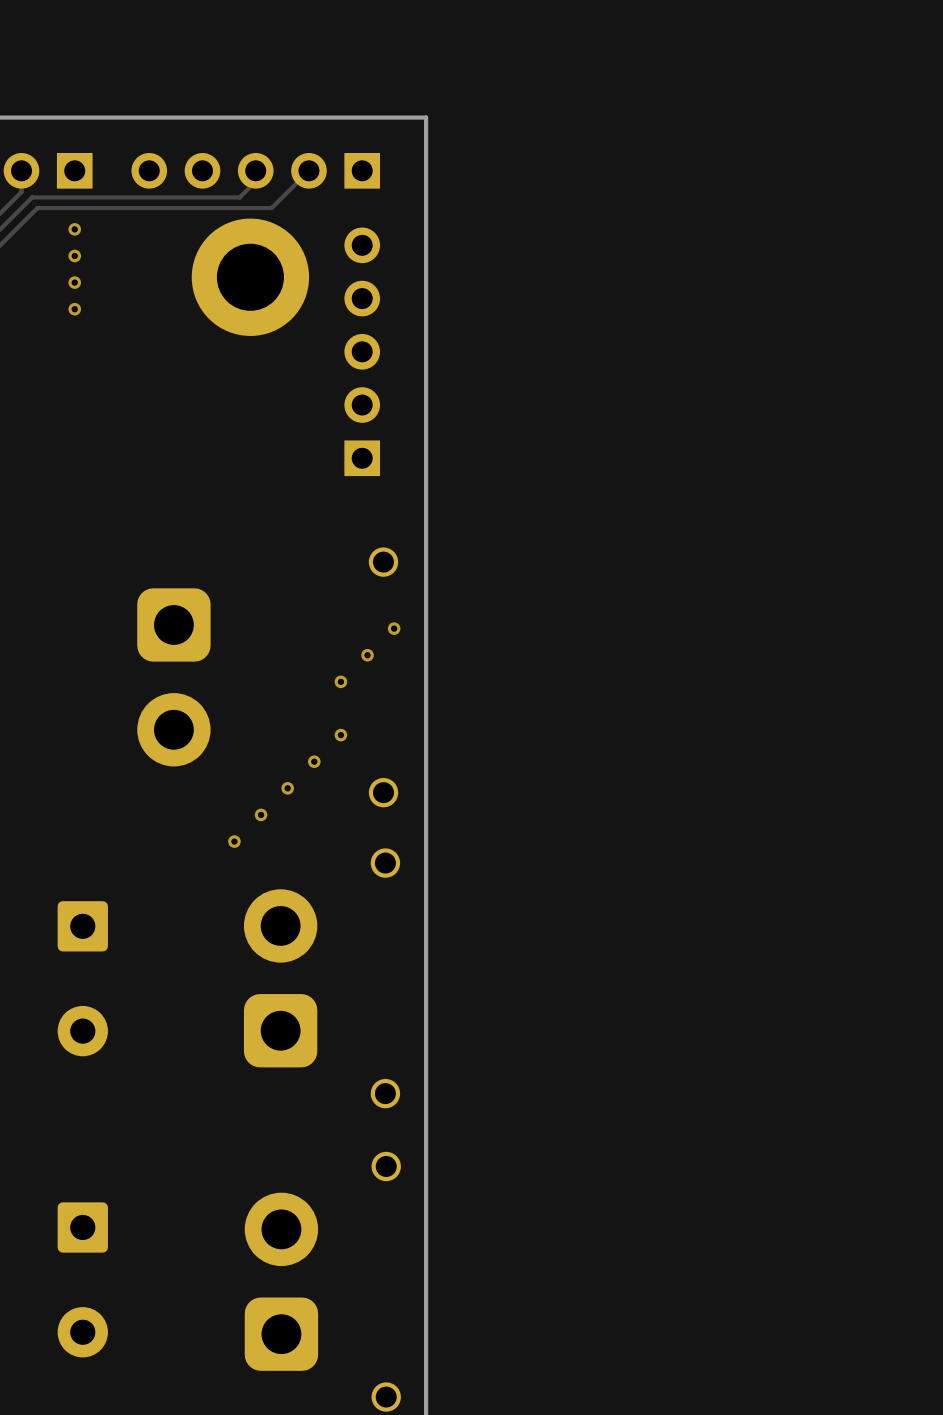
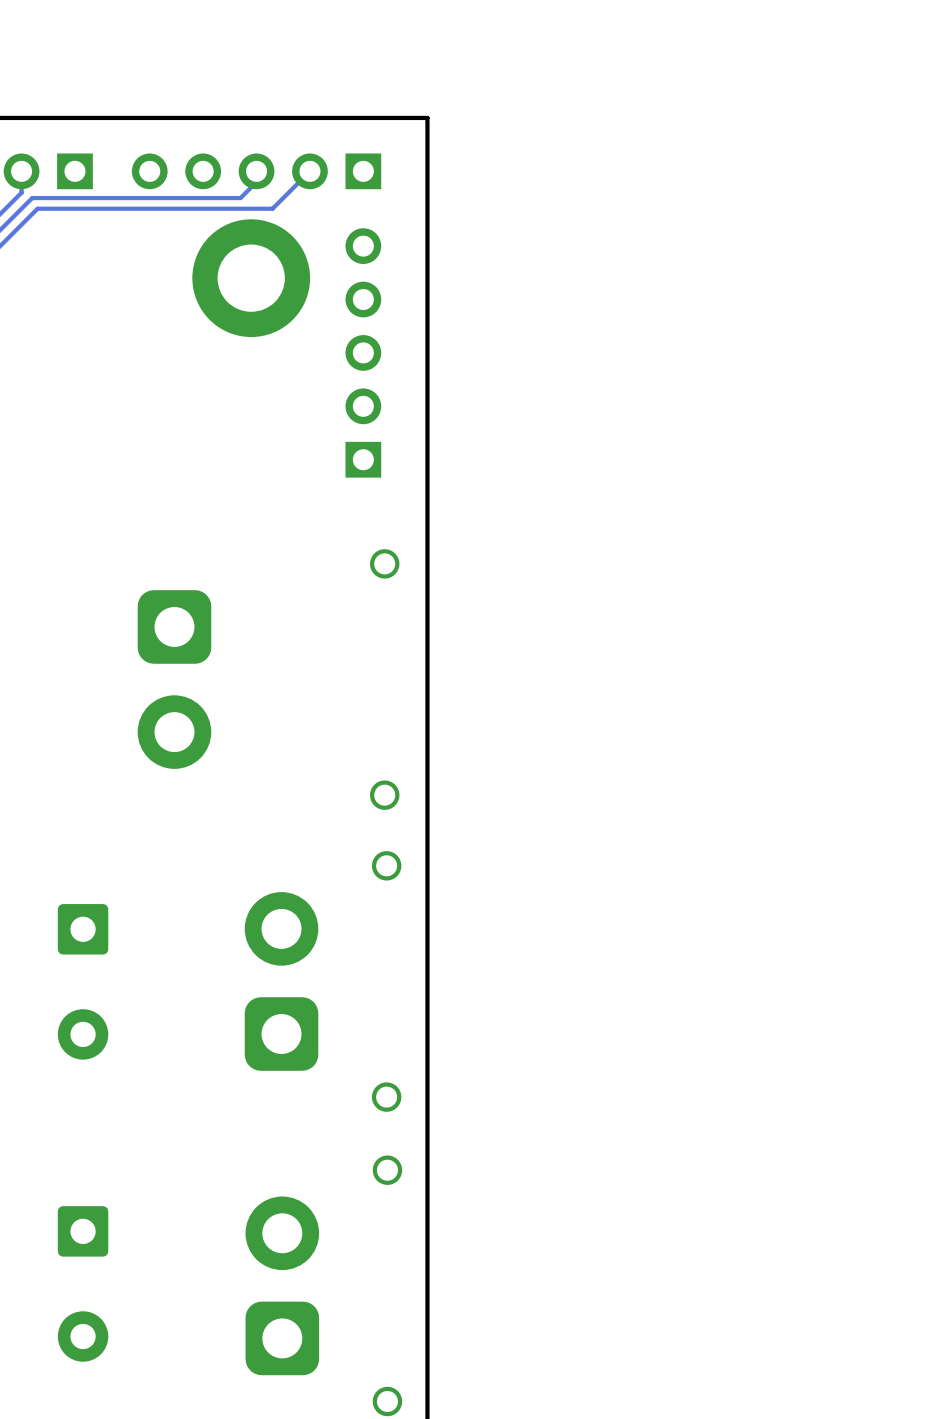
via: (74, 229) -> none
via: (74, 255) -> none
via: (74, 282) -> none
via: (74, 309) -> none
via: (394, 628) -> none
via: (367, 655) -> none
via: (340, 681) -> none
via: (340, 735) -> none
via: (314, 761) -> none
via: (287, 788) -> none
via: (261, 814) -> none
via: (234, 841) -> none

